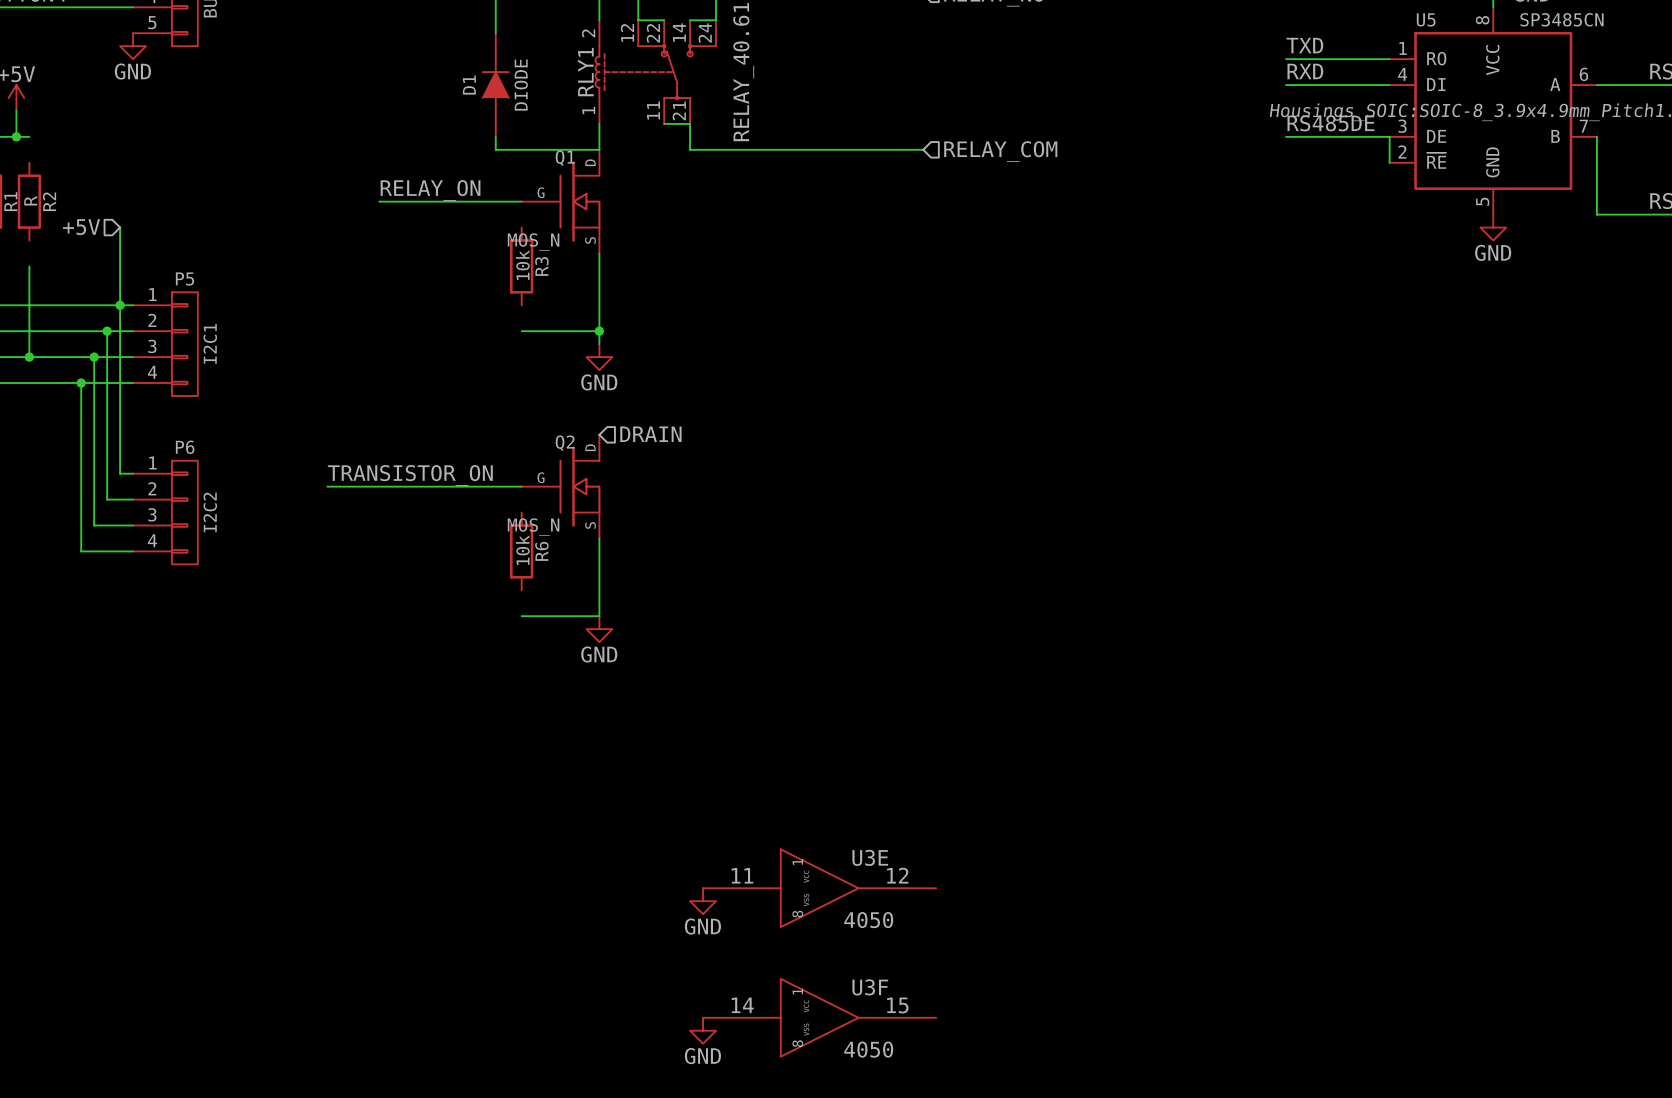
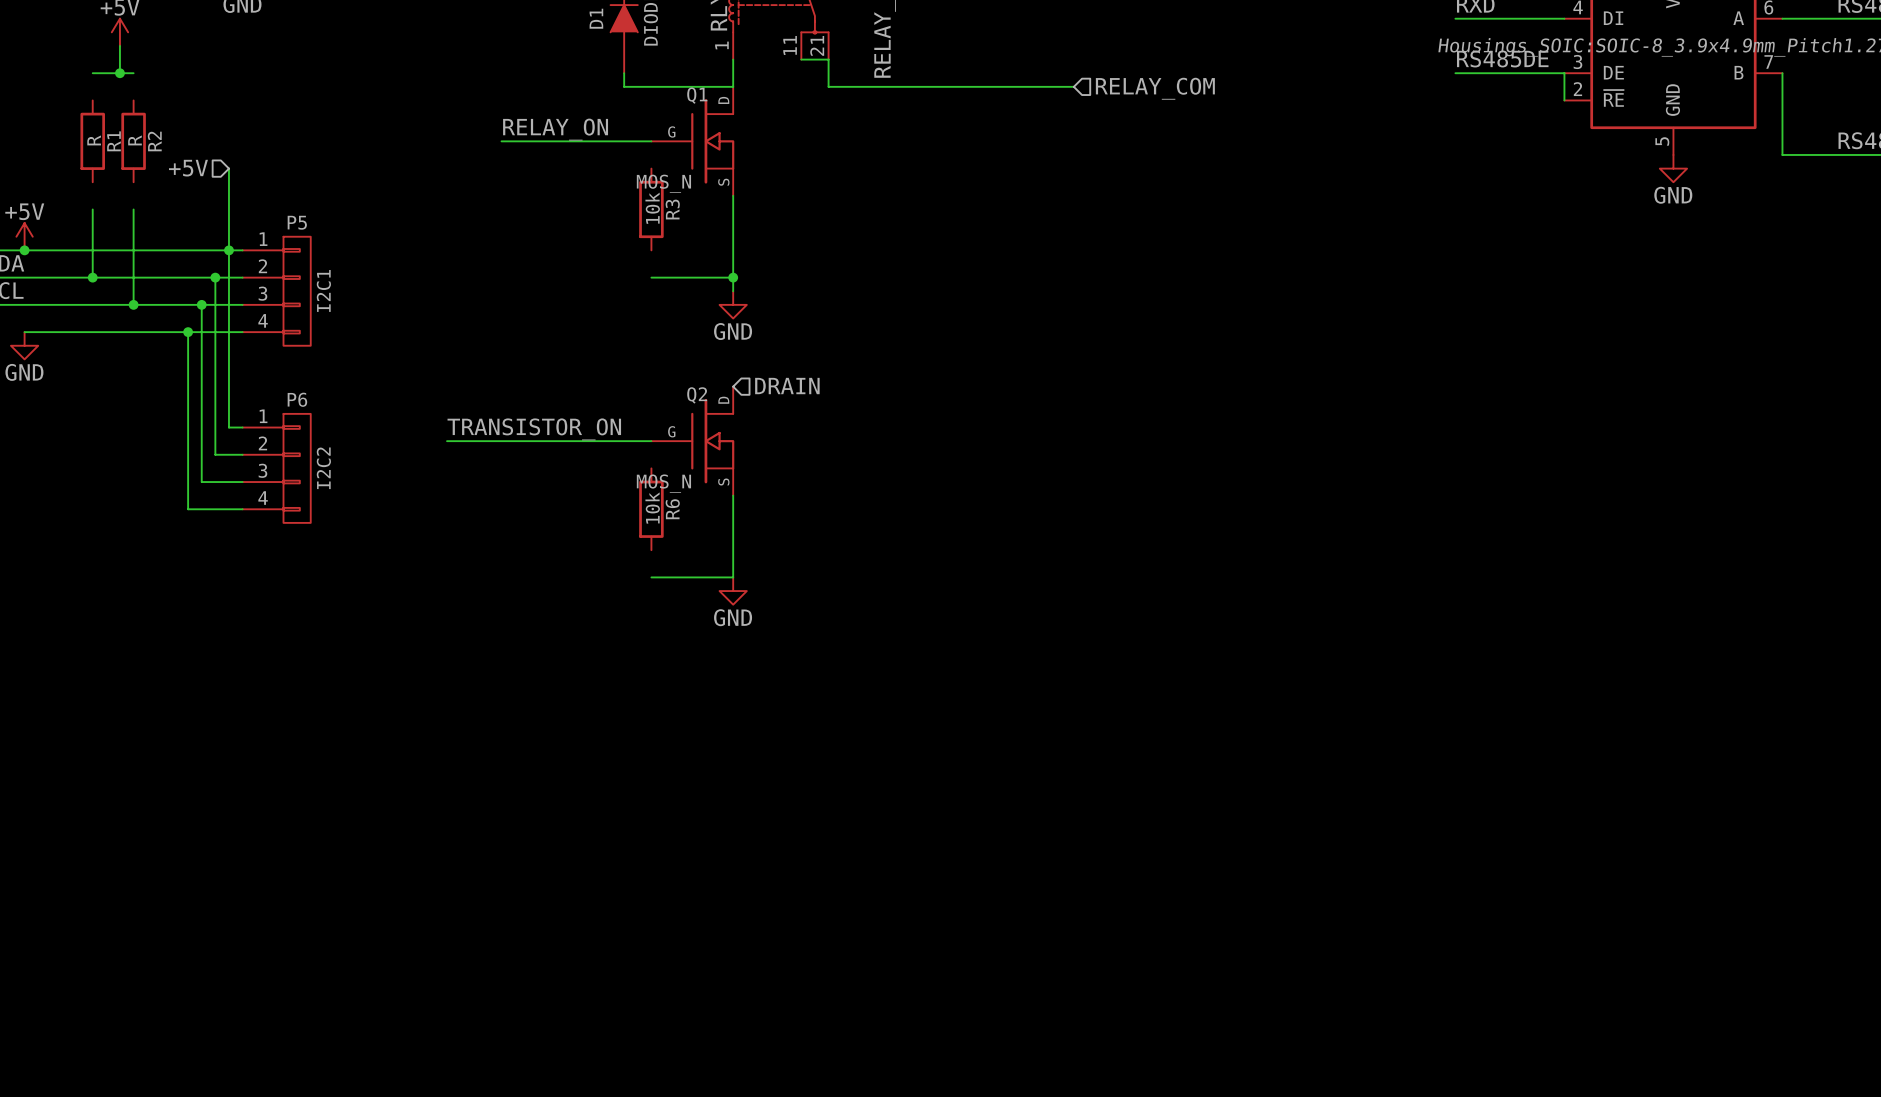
U3E: 4050 (819, 888) -> none
power symbol: GND (703, 901) -> none
U3F: 4050 (819, 1017) -> none
power symbol: GND (703, 1030) -> none

